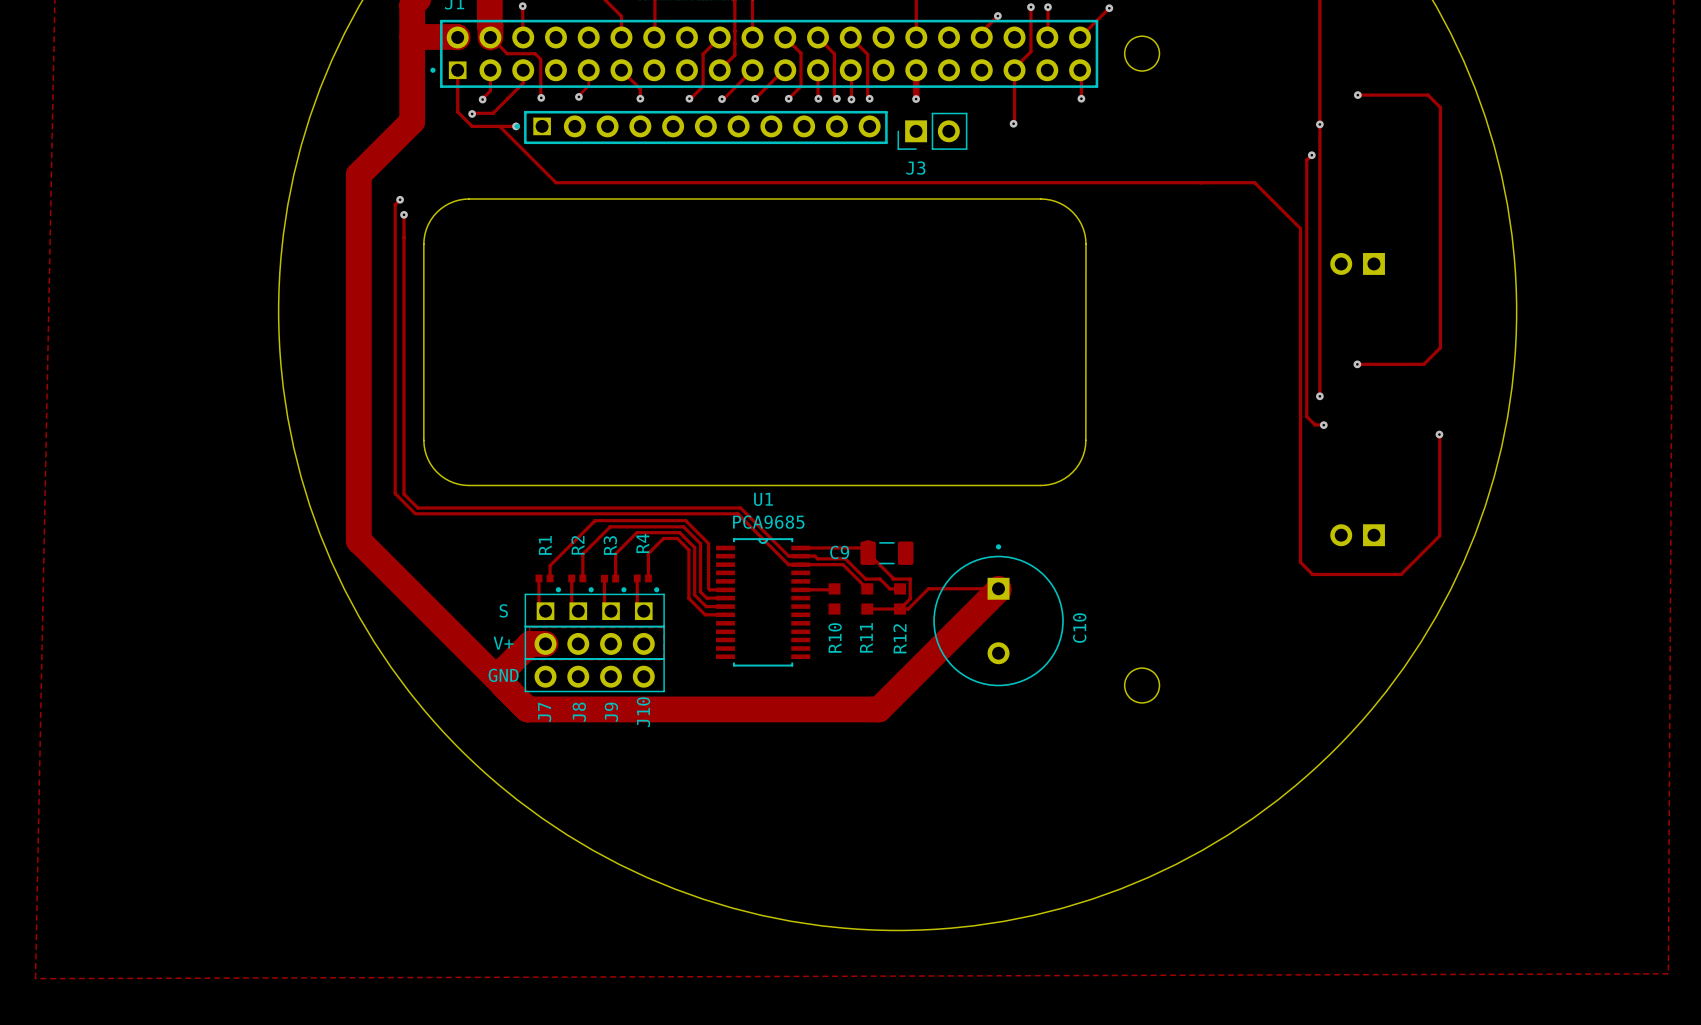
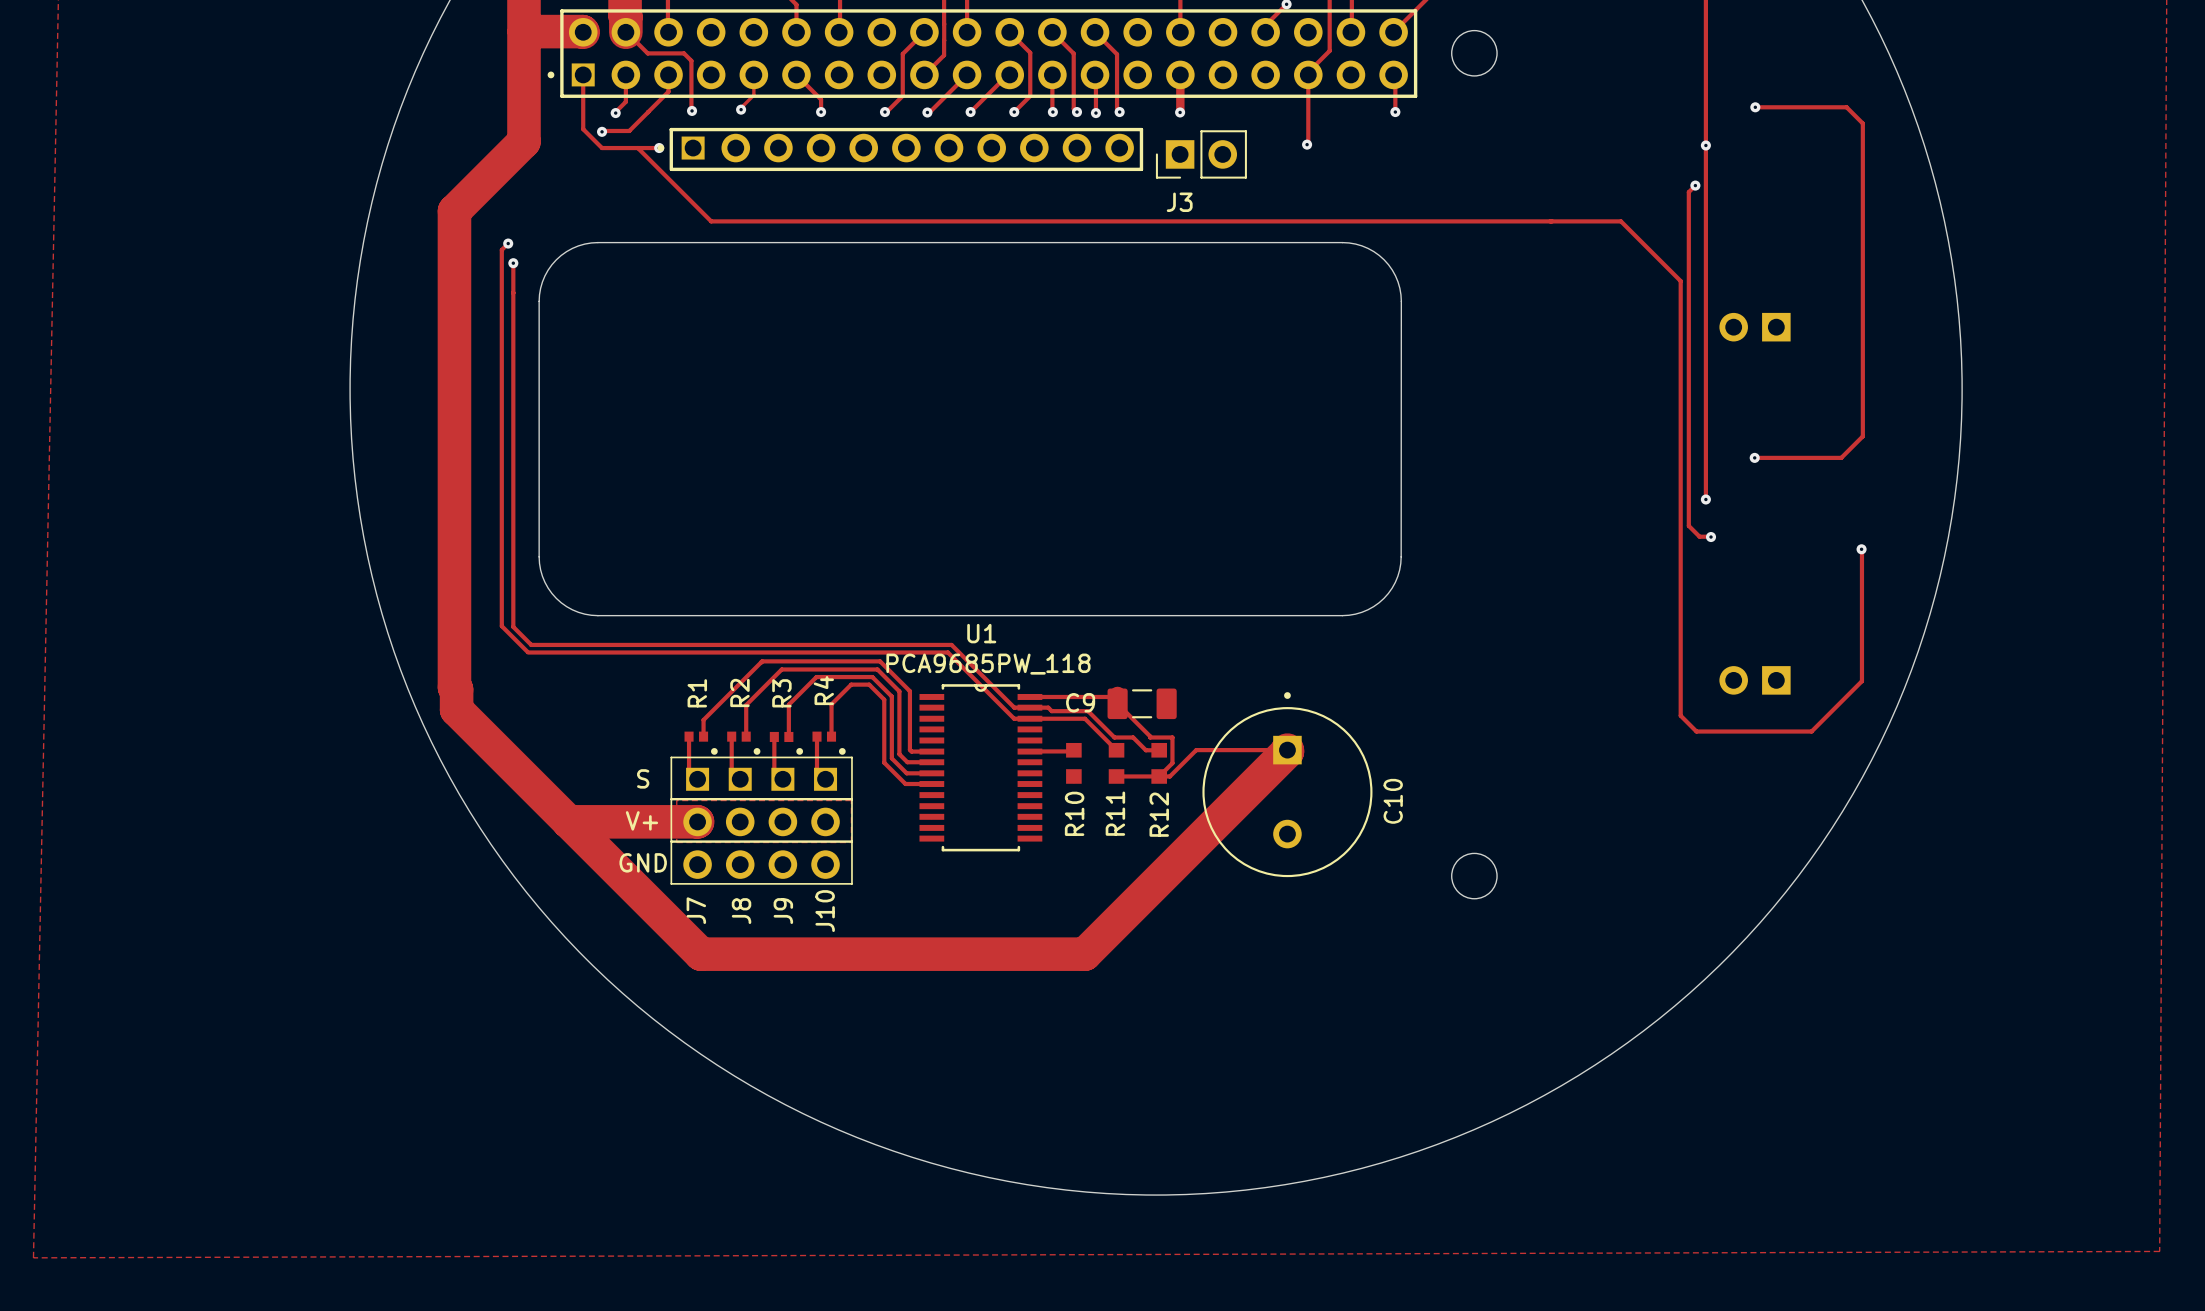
U1 value: PCA9685 (768, 522) -> PCA9685PW_118 (988, 664)
track: (360, 542) (527, 709) (878, 709) -> (456, 689) (456, 709) (700, 954) (1084, 954) (1131, 907)
track: (545, 643) (530, 643) (503, 670) (503, 685) -> (697, 821) (568, 821)

